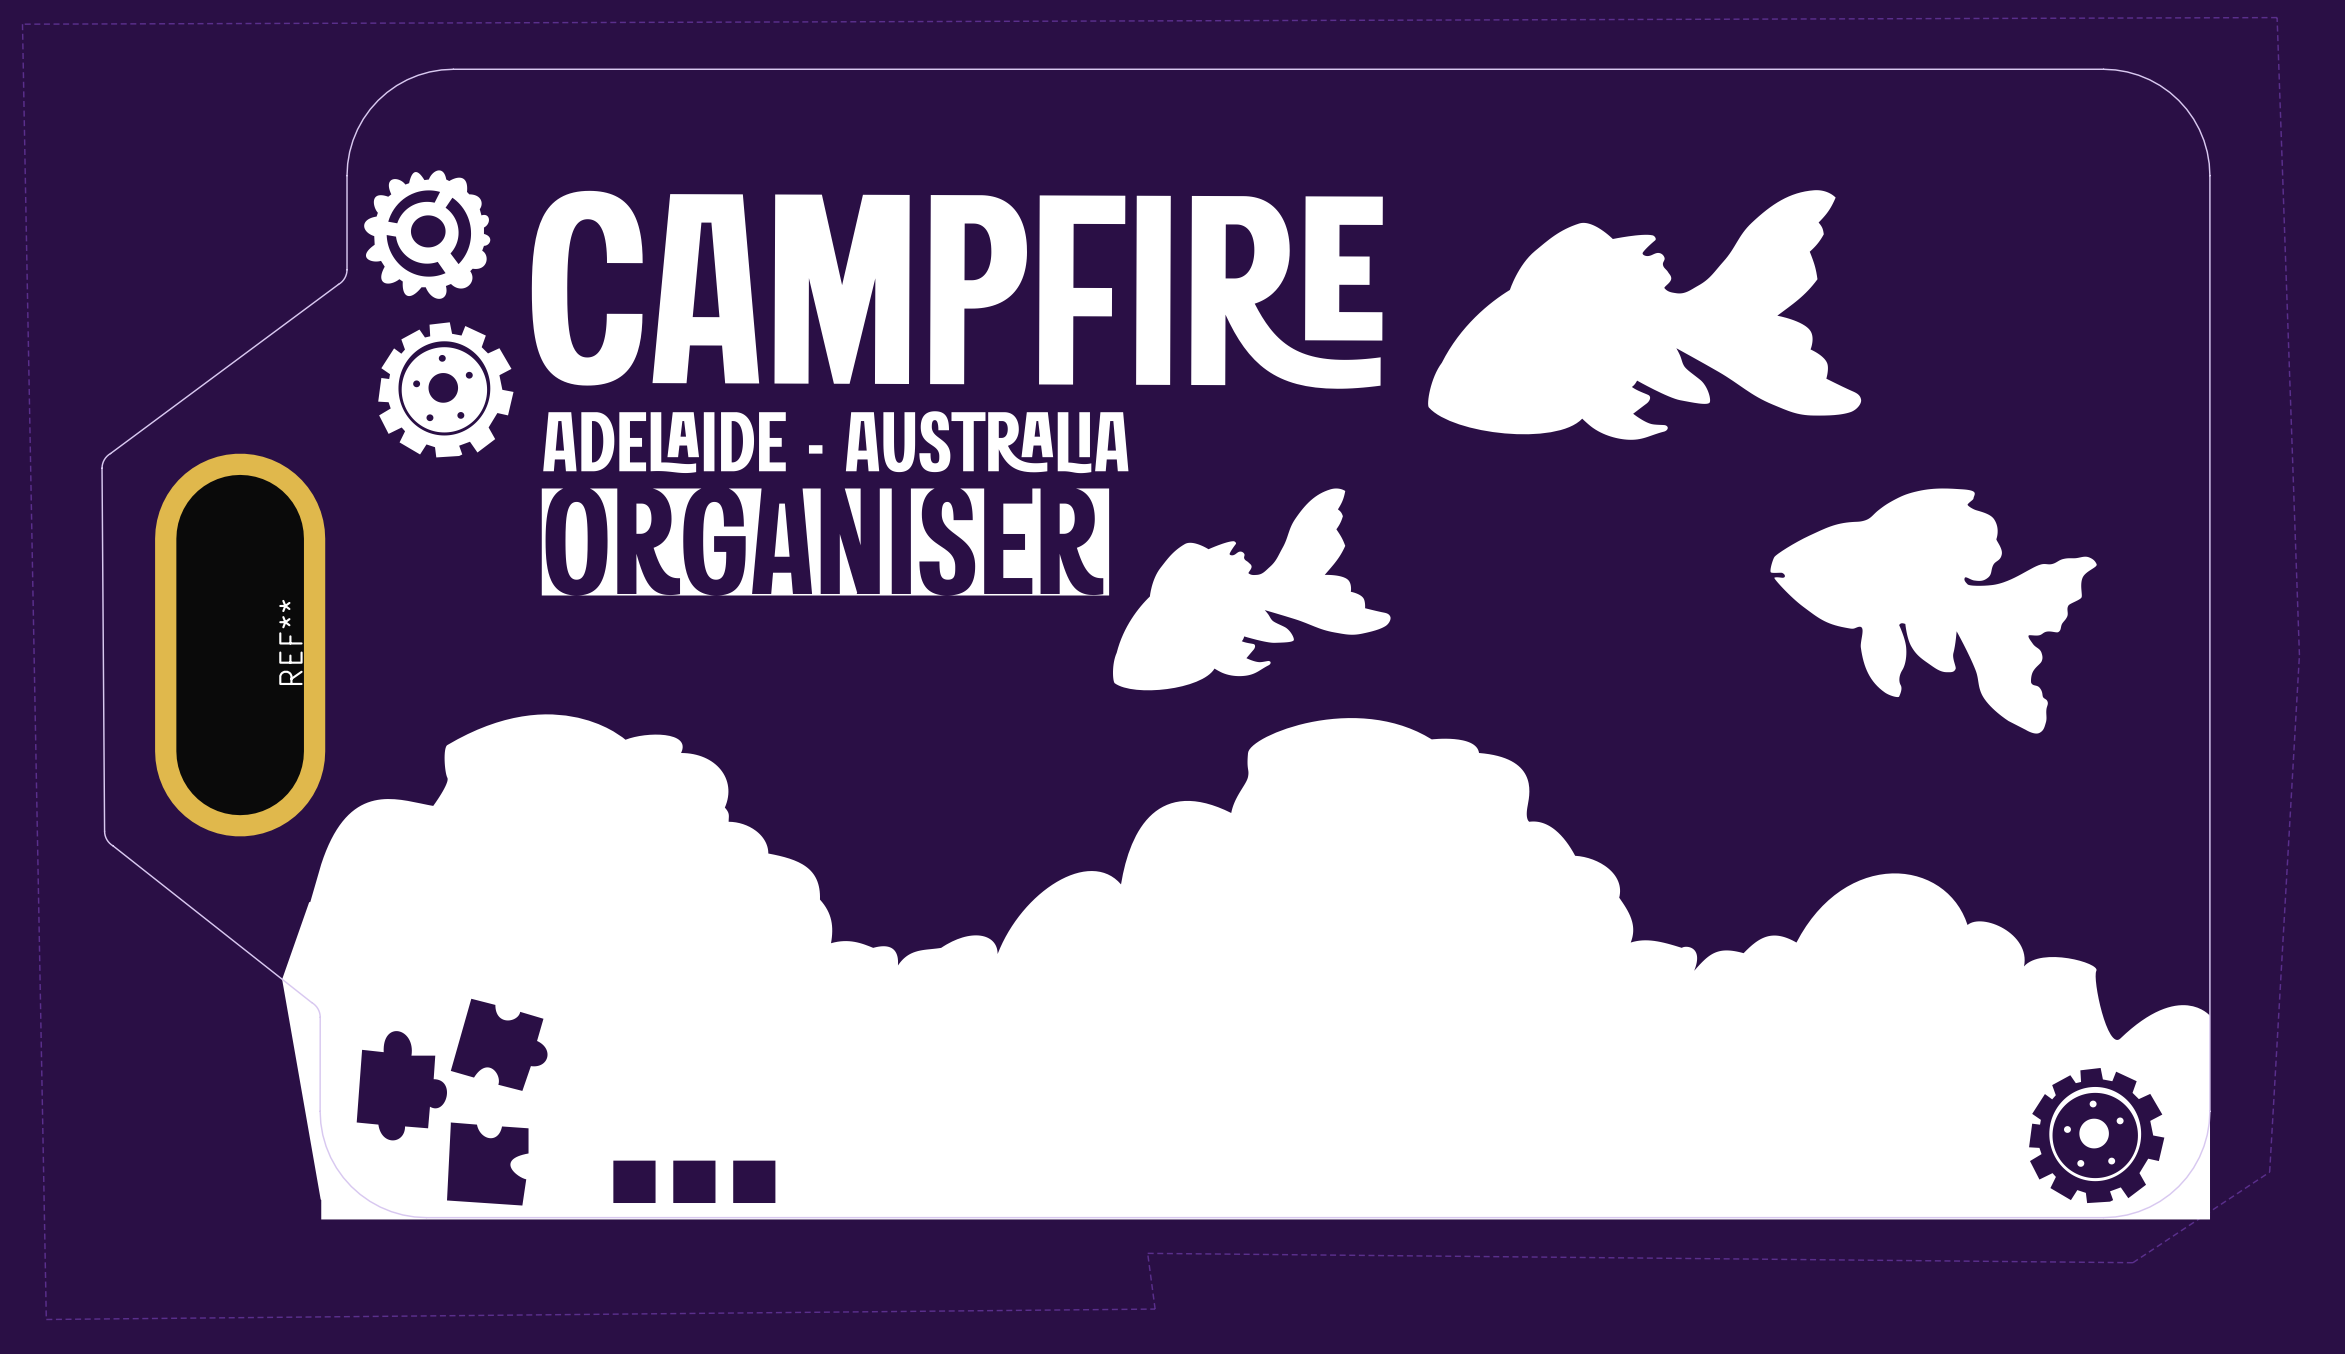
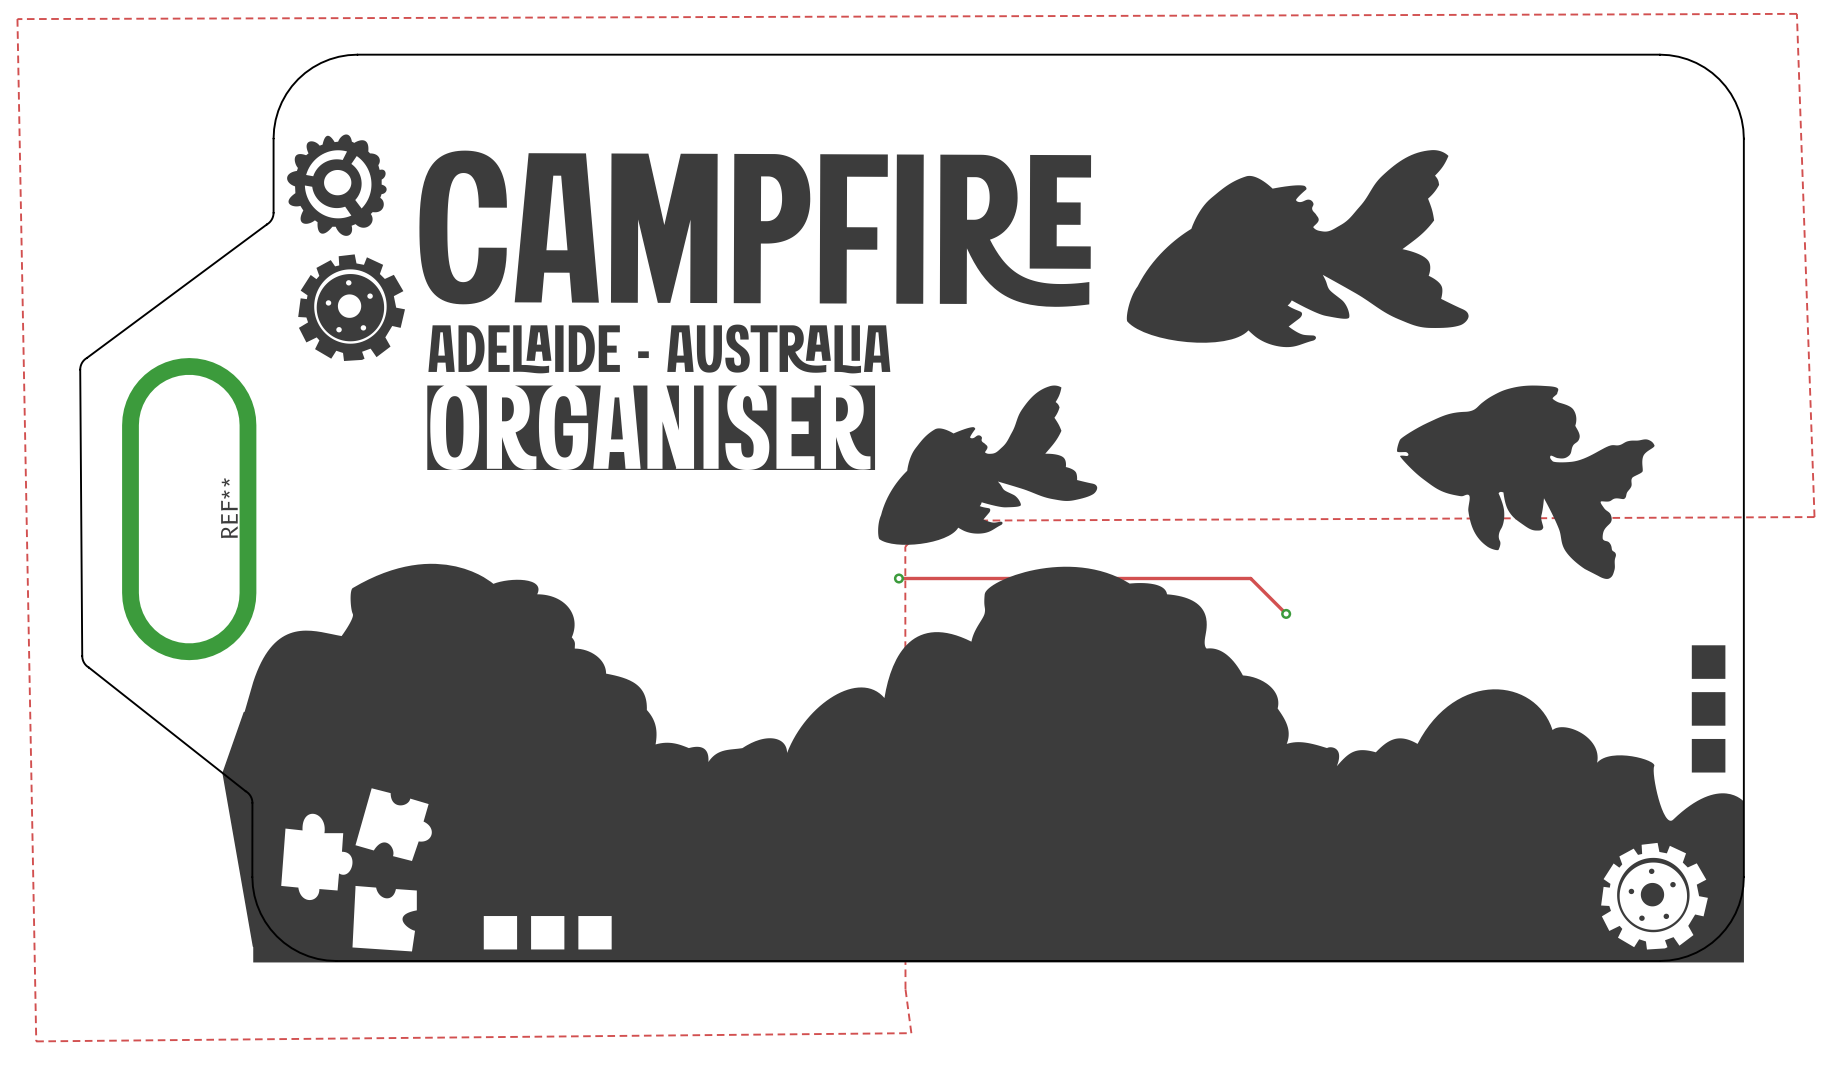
zone outline: (2299, 655) (2269, 1172) (2132, 1262) (1147, 1253) -> (1814, 517) (931, 520) (905, 546) (905, 989)
track: none -> (898, 578) (1250, 578) (1286, 613)
via: none -> (898, 578)
via: none -> (1286, 613)
drawing: none -> [1691, 645, 1726, 773]

